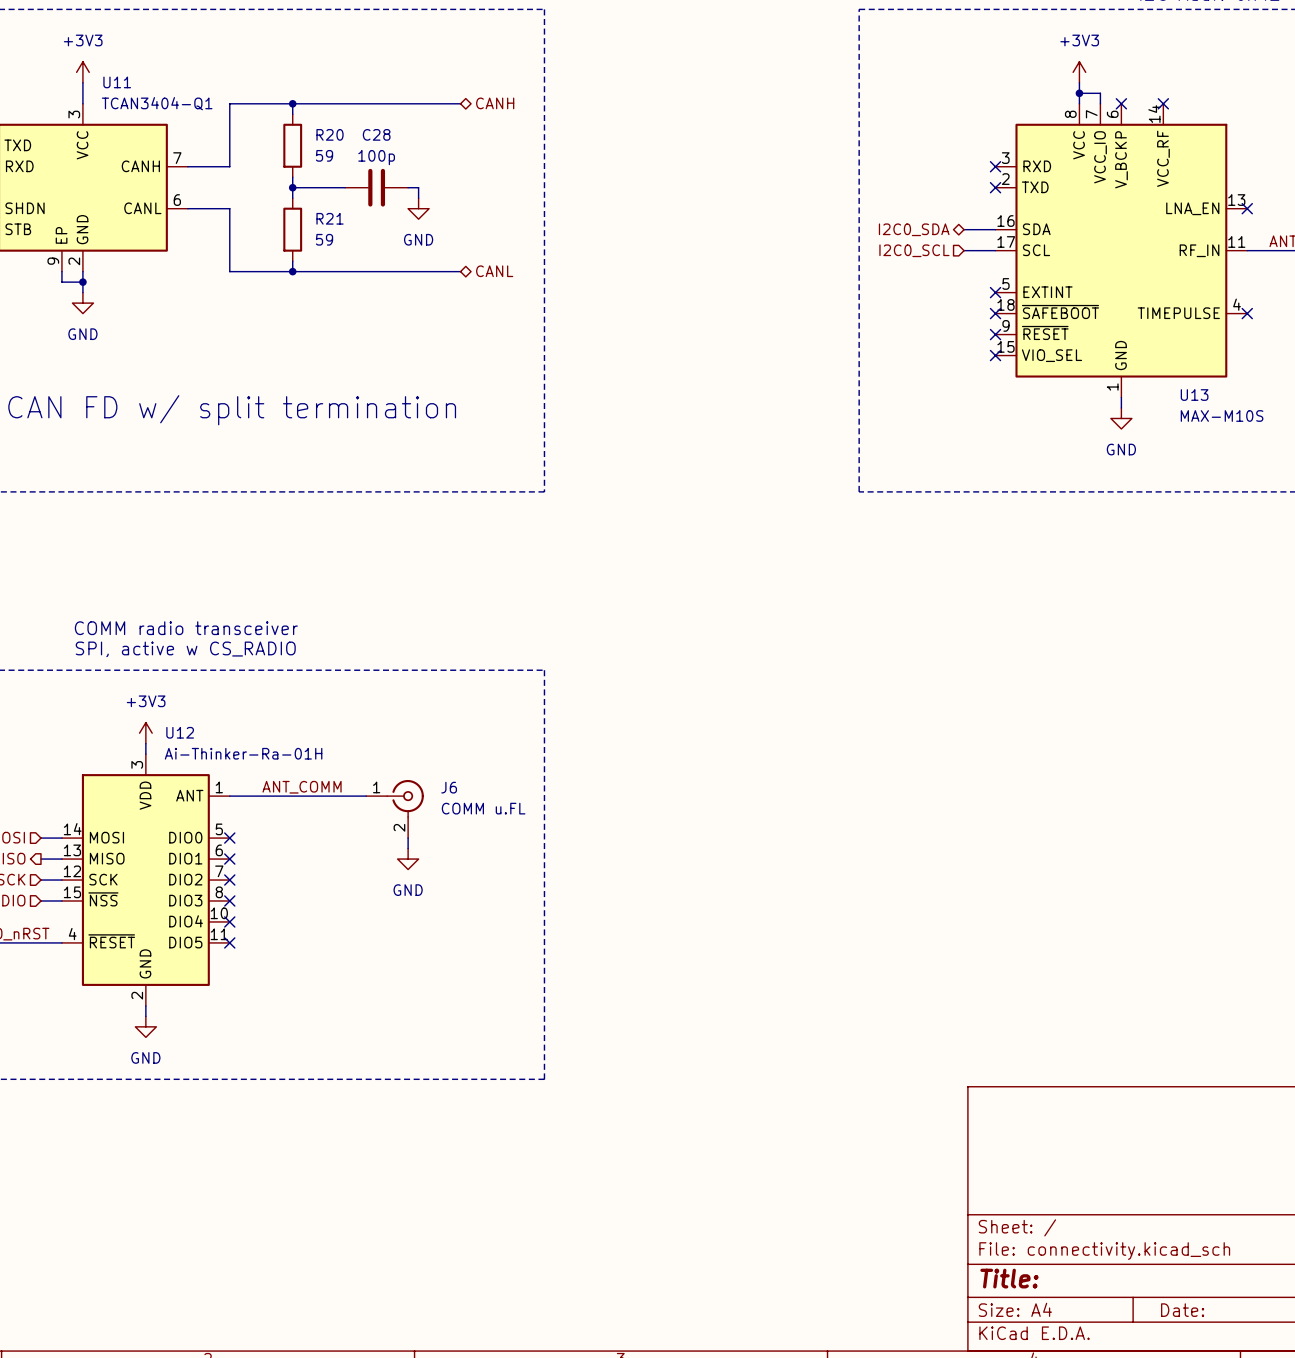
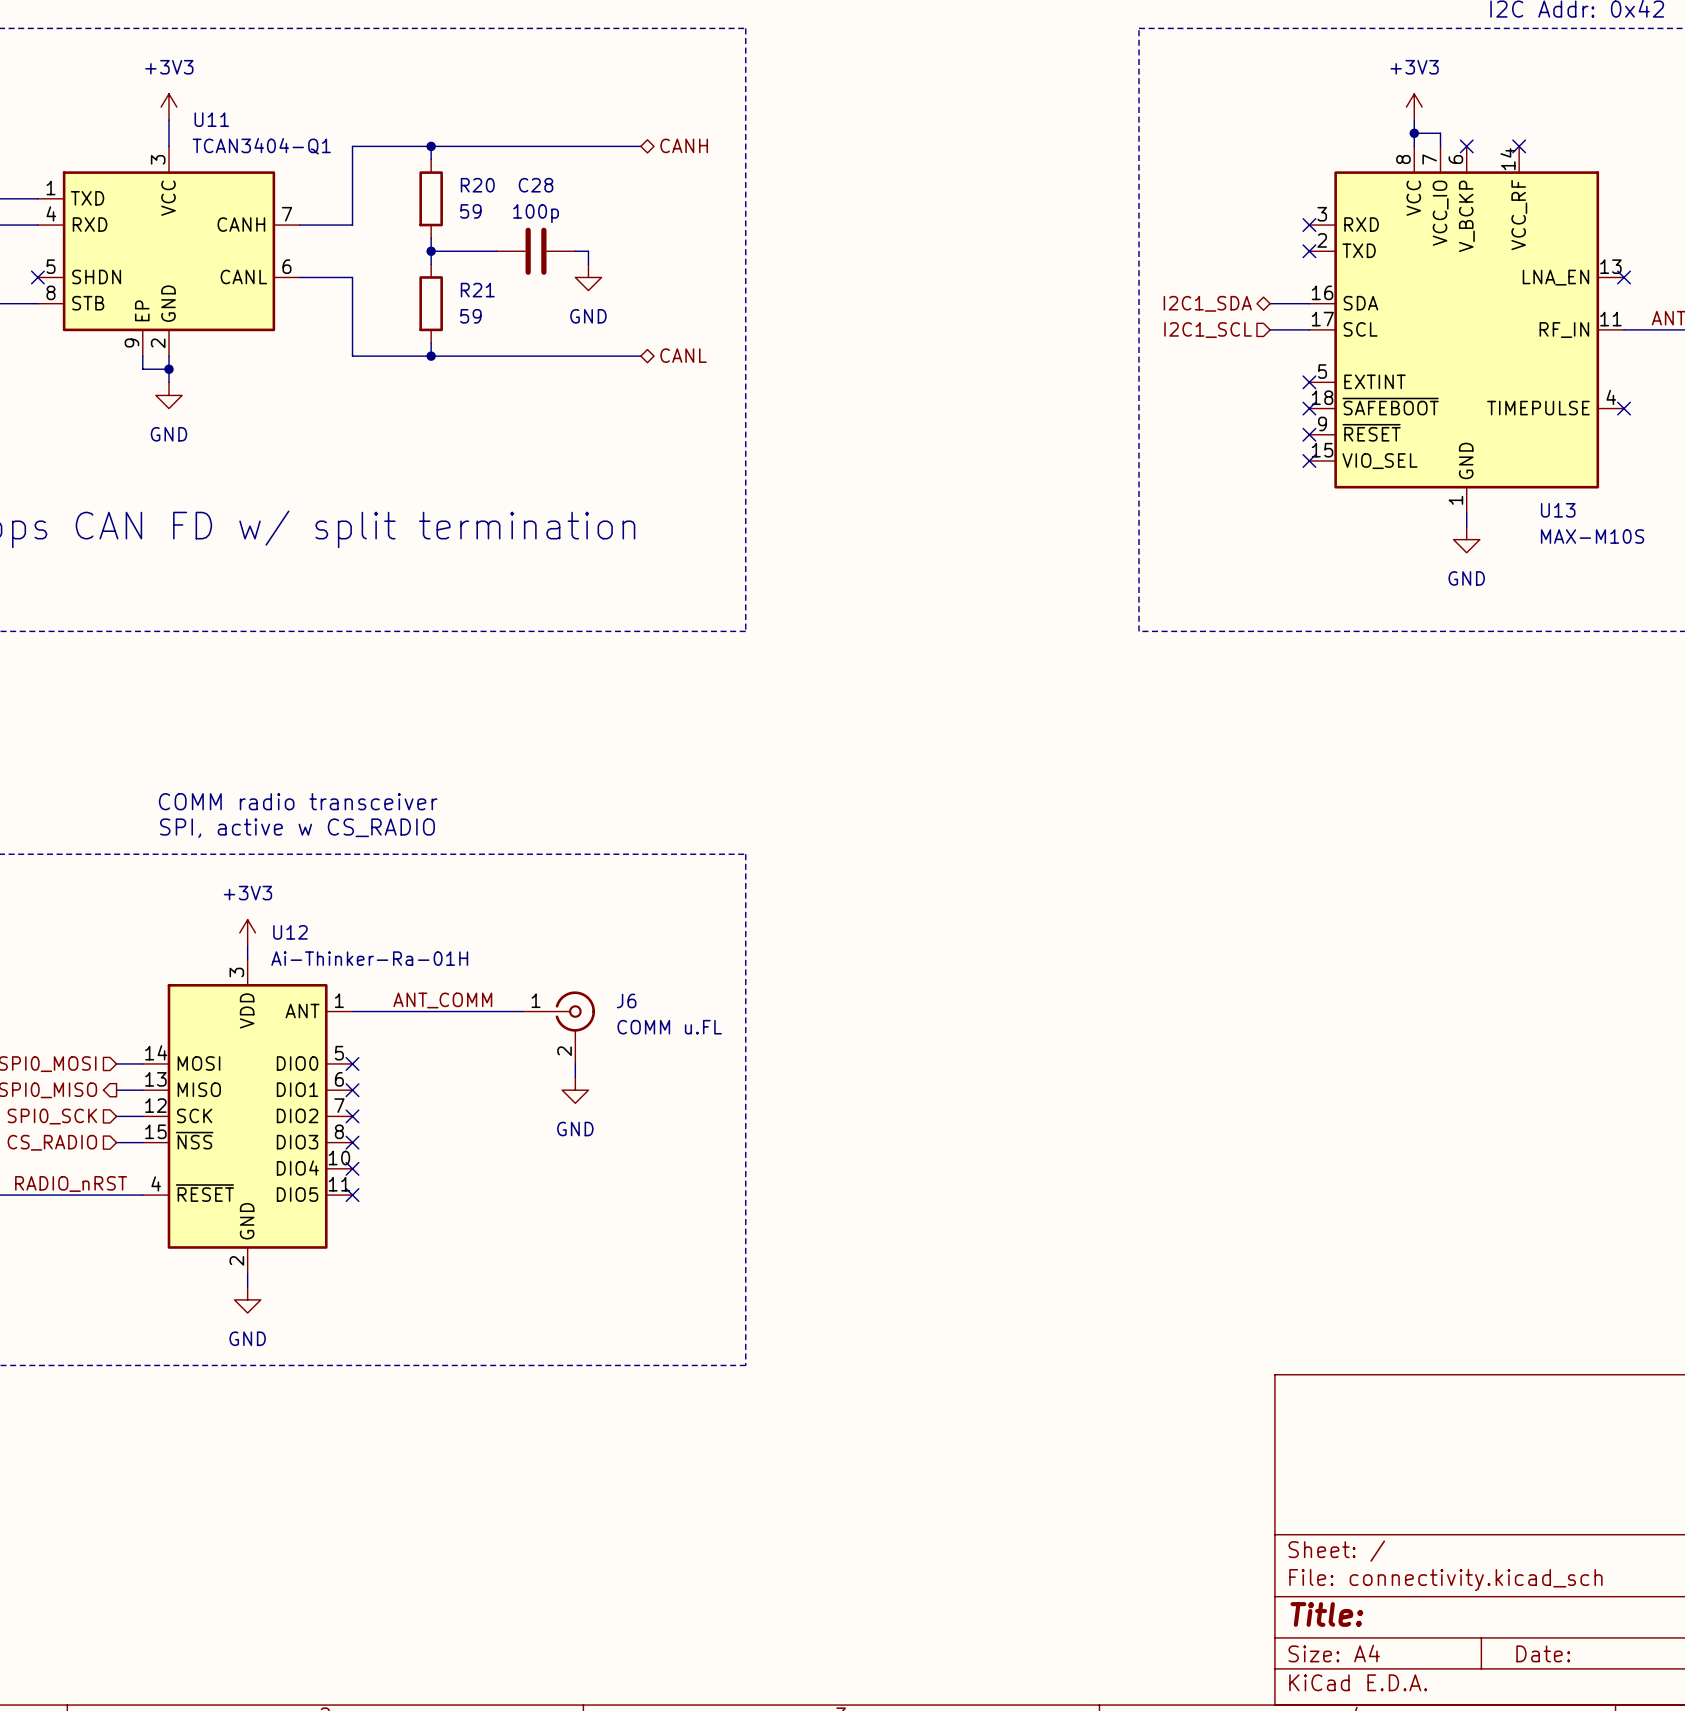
hierarchical label: I2C0_SDA (914, 229) -> I2C1_SDA (1207, 303)
hierarchical label: I2C0_SCL (914, 250) -> I2C1_SCL (1208, 330)

